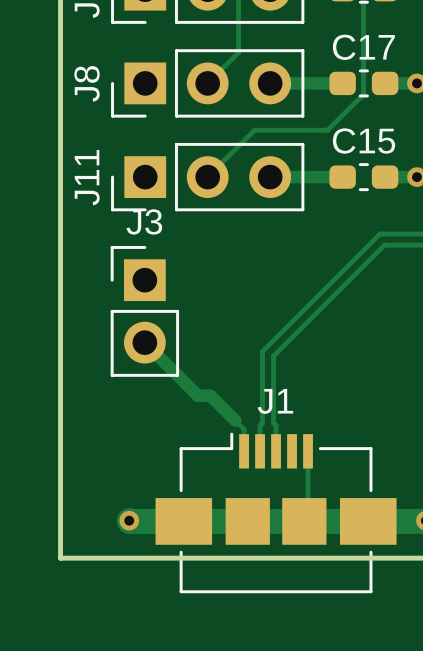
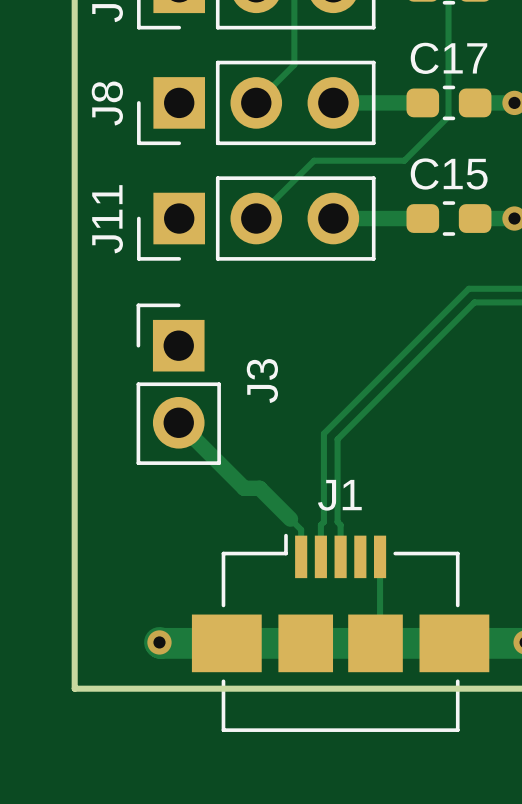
J3 name rotation: 0° (144, 221) -> 90° counterclockwise (262, 381)
J3 name position: J3 (144, 221) -> J3 (262, 381)

